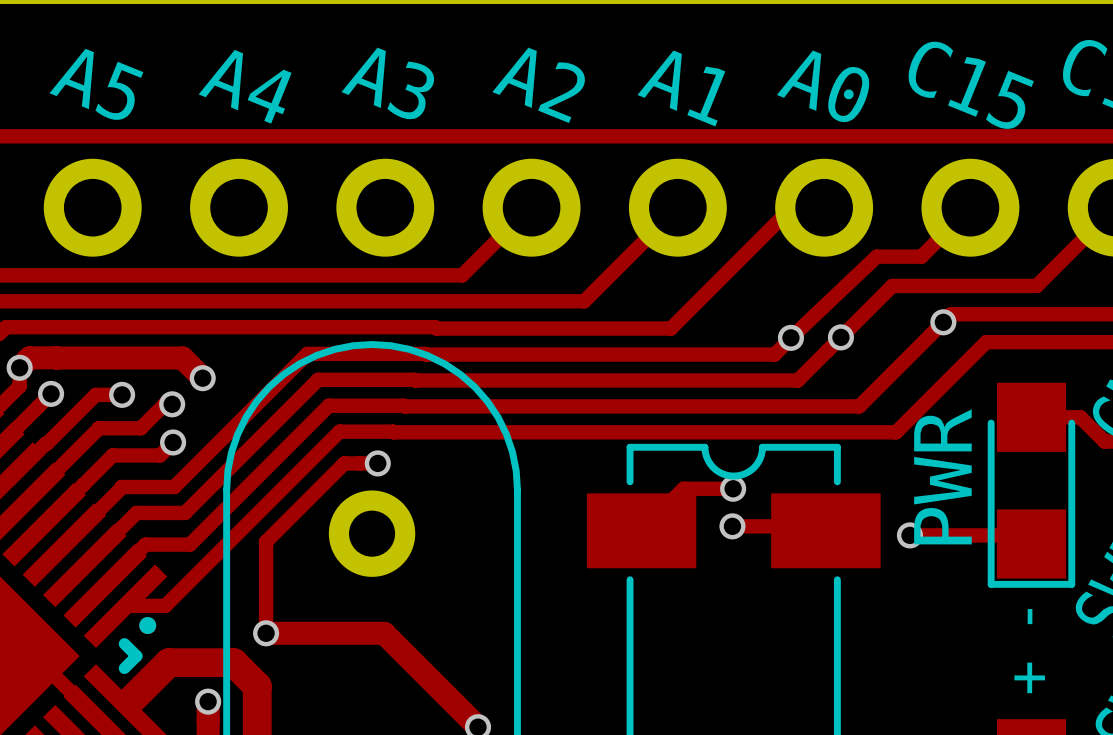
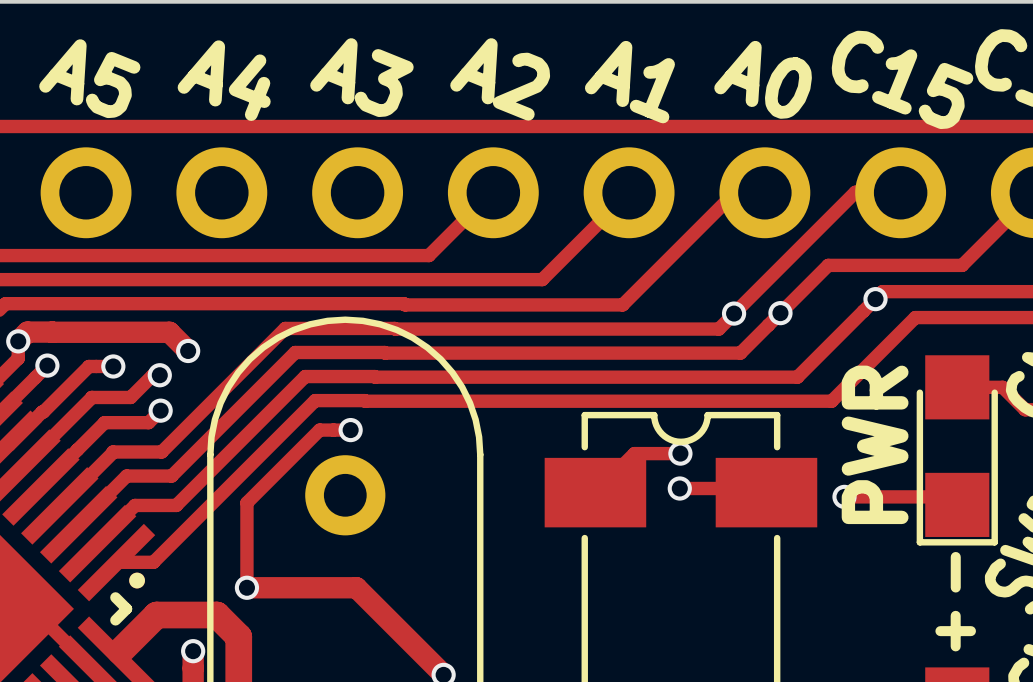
track: (970, 207) (921, 256) (876, 256) (790, 337) -> (901, 192) (855, 192) (734, 313)

